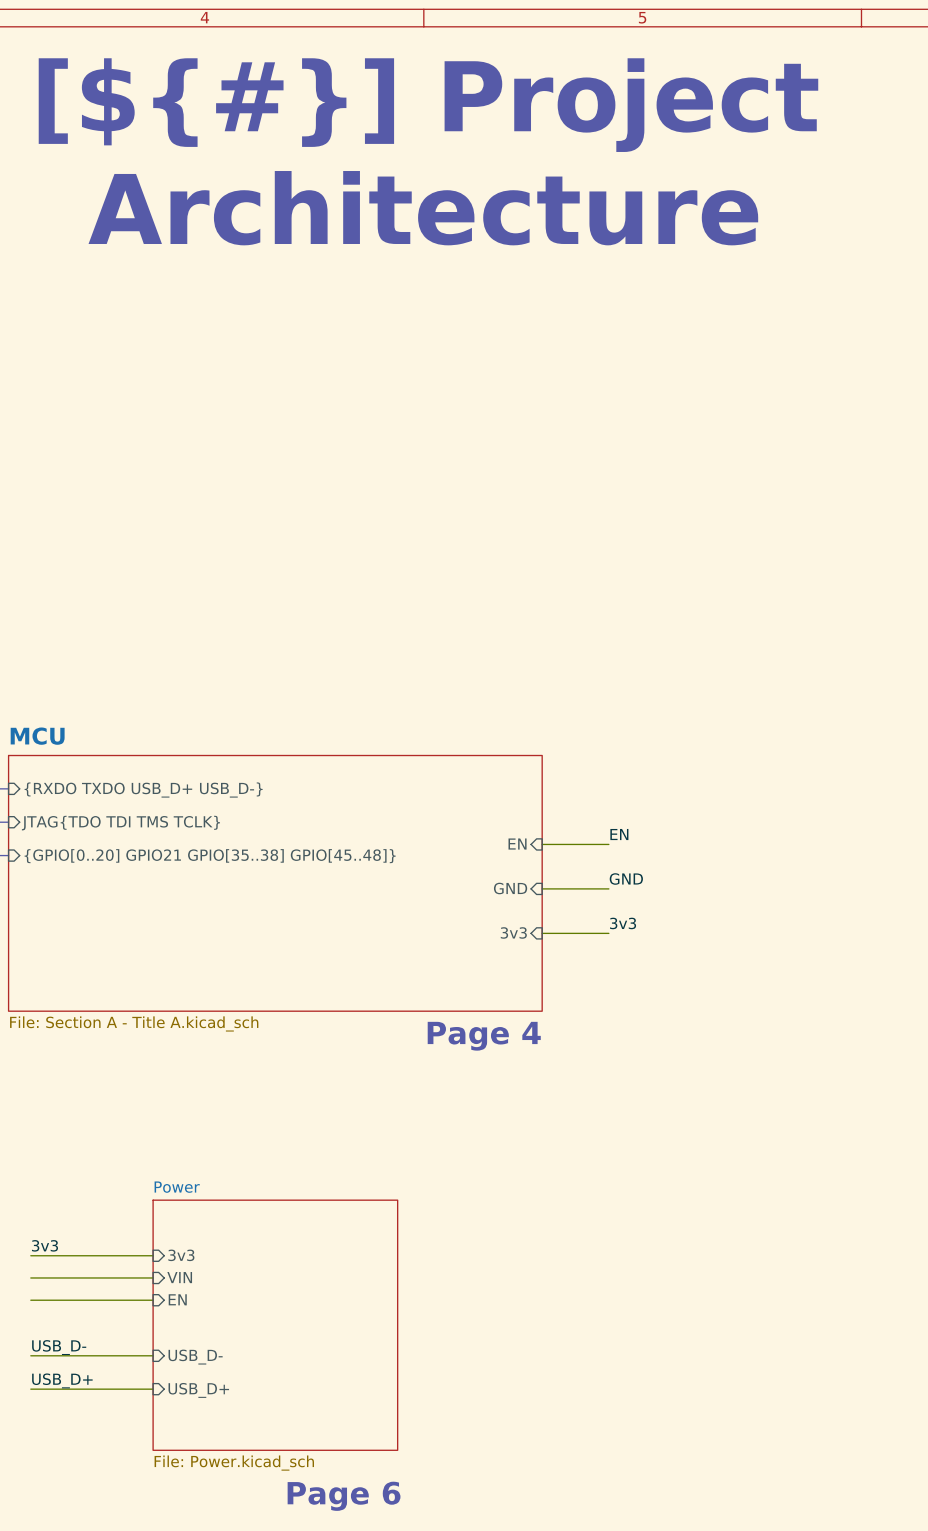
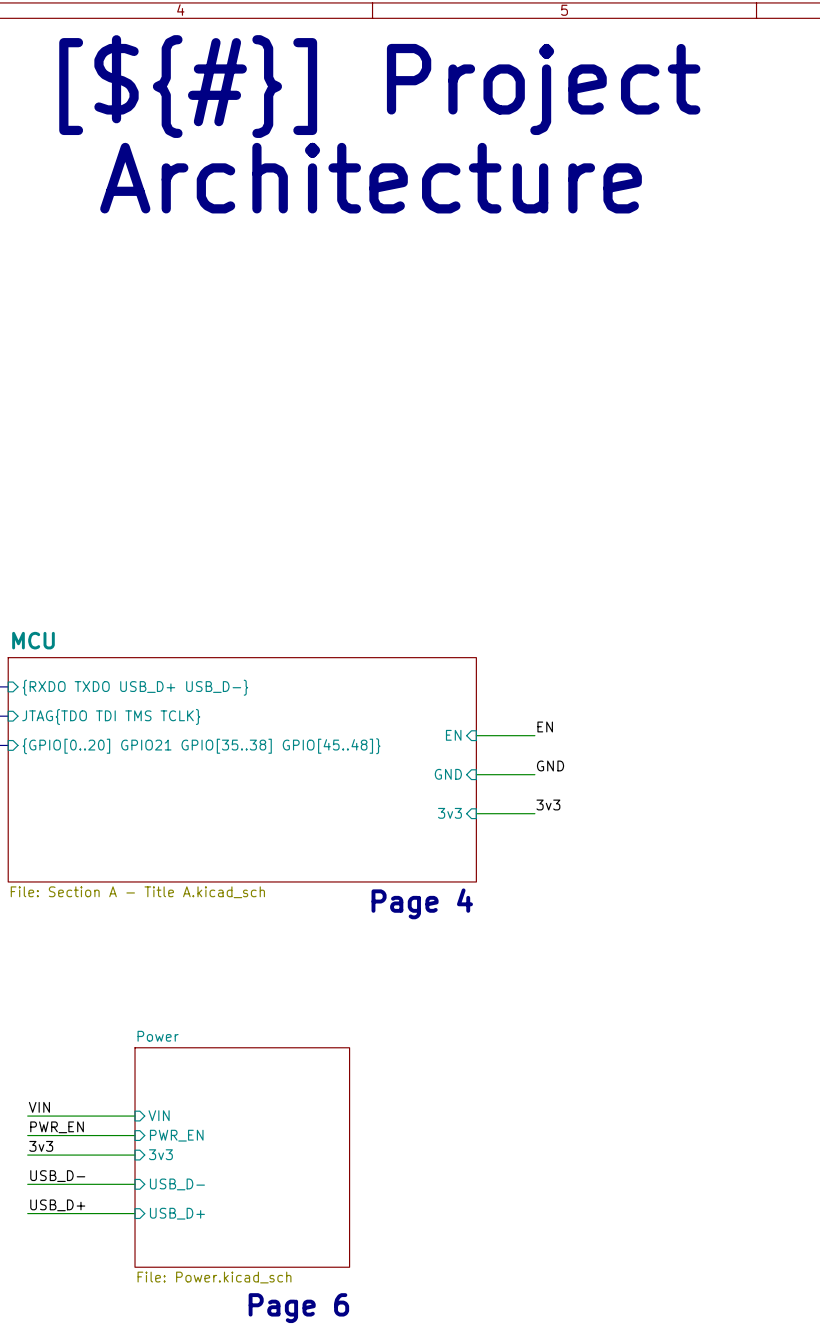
label position: 3v3 (44, 1245) -> 3v3 (41, 1146)
wire: (30, 1255) (153, 1255) -> (27, 1155) (135, 1155)
sheet pin position: 3v3 (181, 1255) -> 3v3 (160, 1154)
label: none -> VIN (39, 1107)
label: none -> PWR_EN (57, 1127)
sheet pin: EN (177, 1299) -> PWR_EN (176, 1135)

